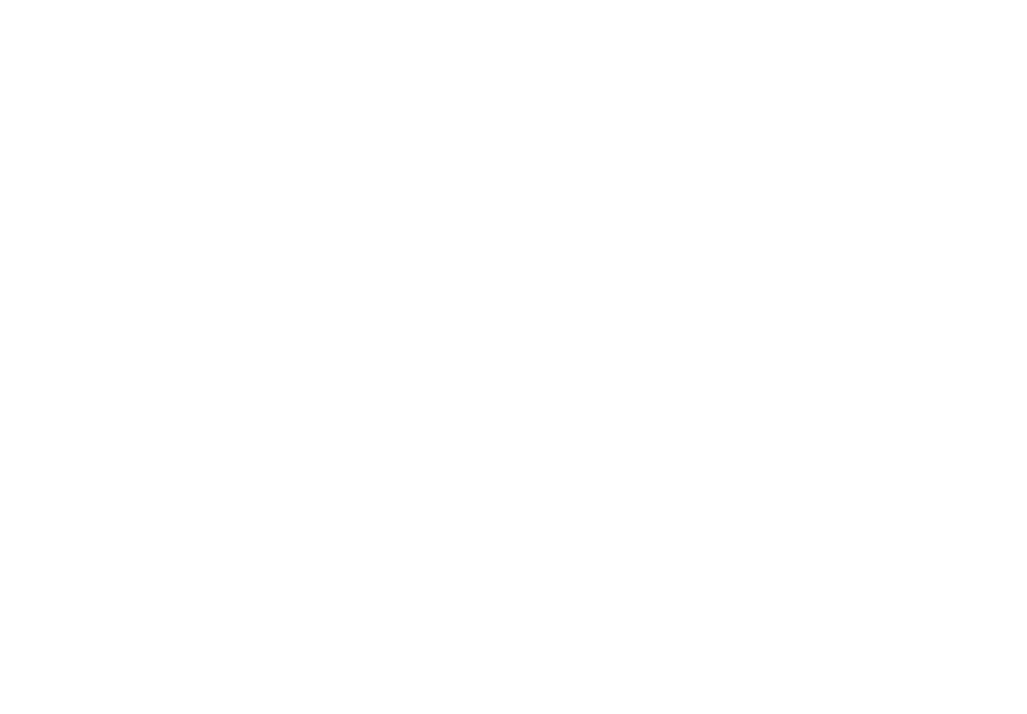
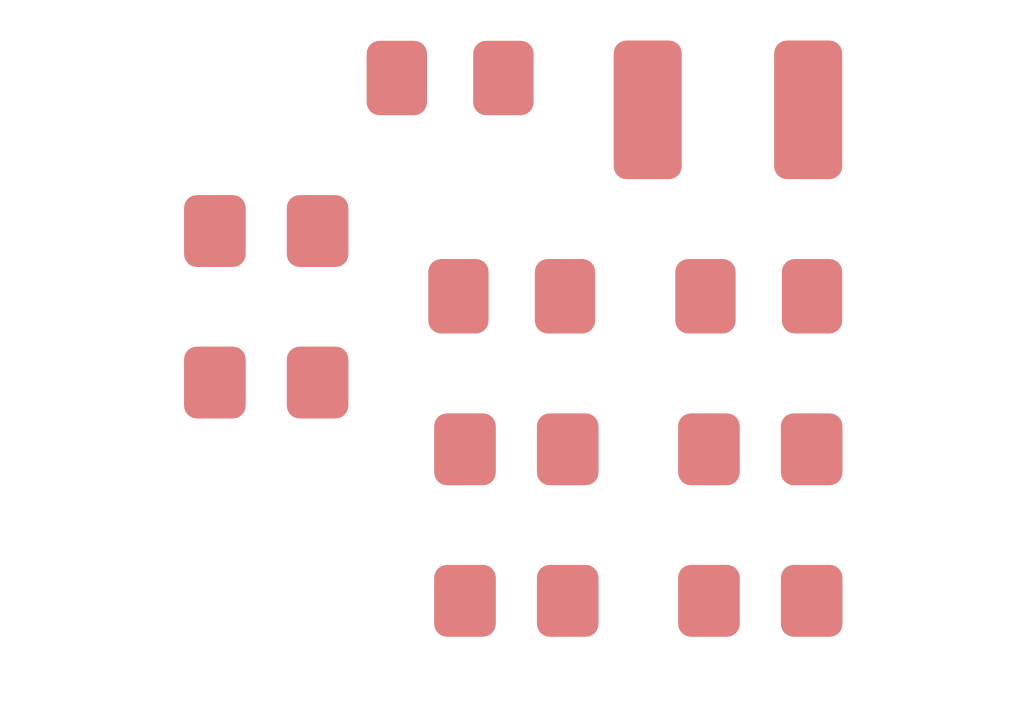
part: none -> (450, 77)
part: none -> (727, 109)
part: none -> (266, 231)
part: none -> (511, 296)
part: none -> (758, 296)
part: none -> (266, 382)
part: none -> (516, 449)
part: none -> (760, 449)
part: none -> (516, 600)
part: none -> (760, 600)

